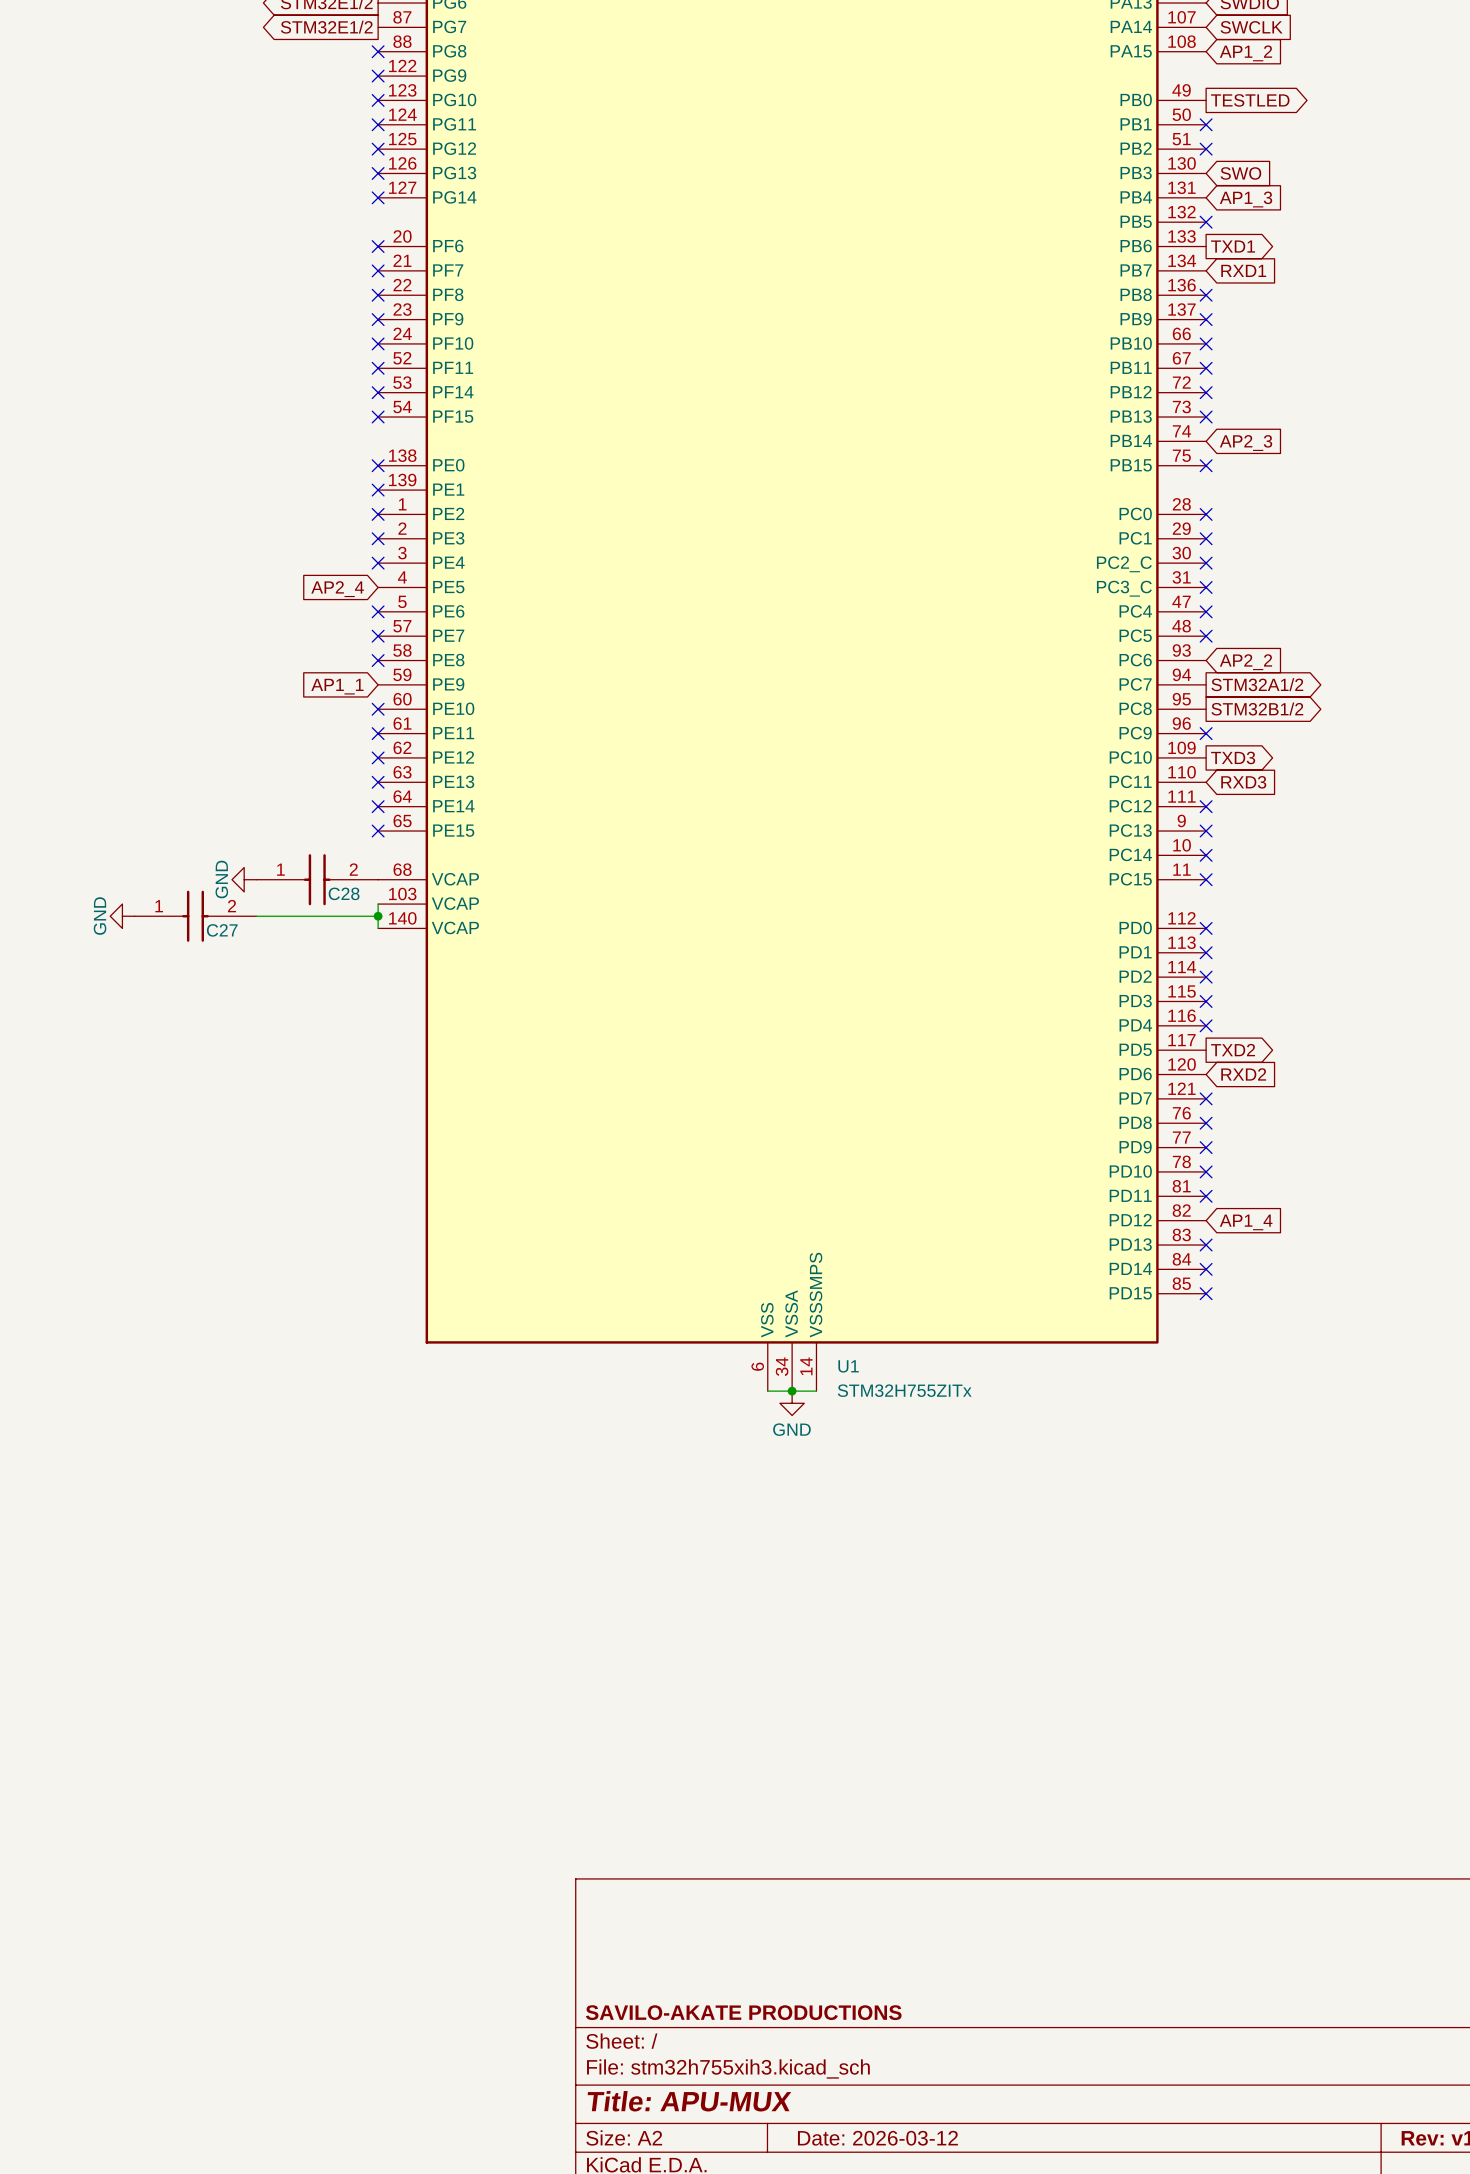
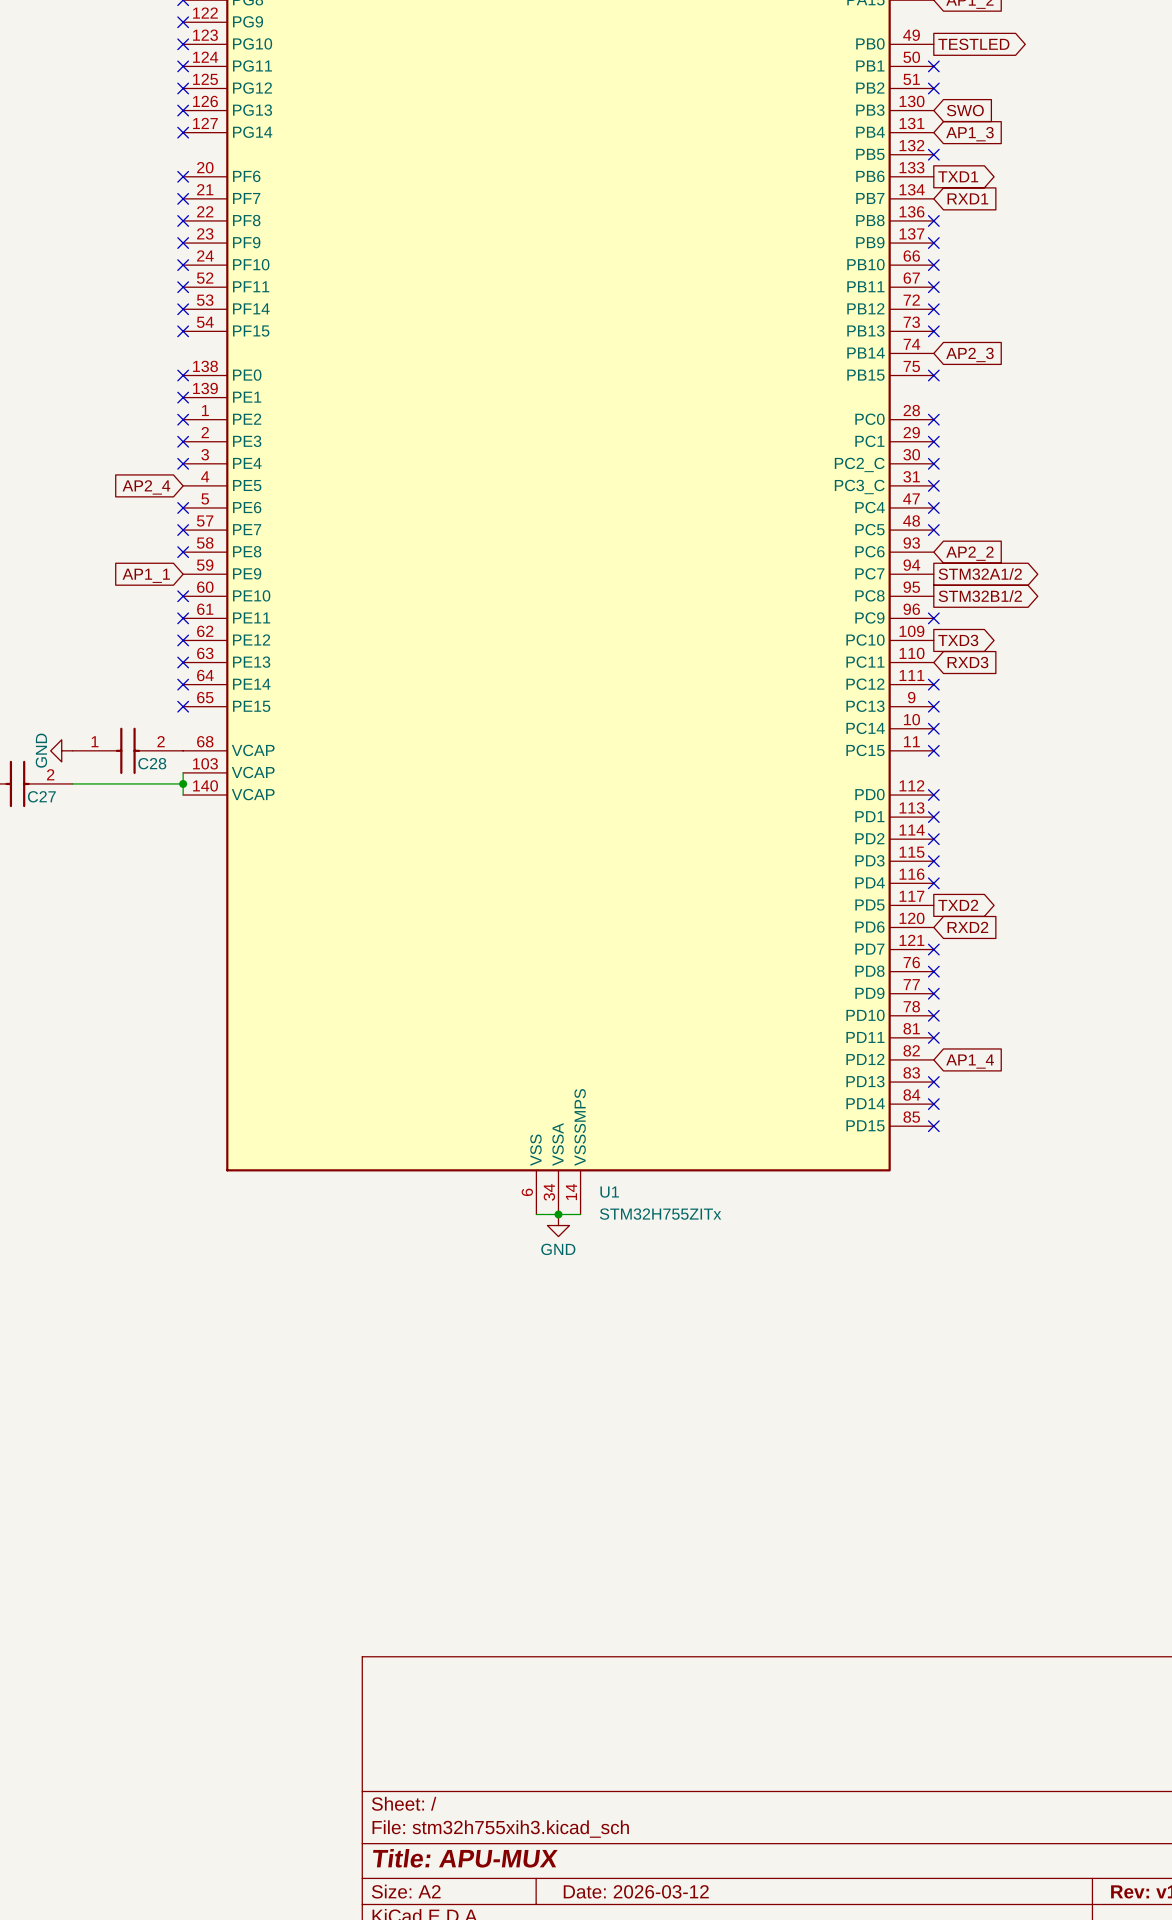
title block: SAVILO-AKATE PRODUCTIONS (743, 2012) -> none

